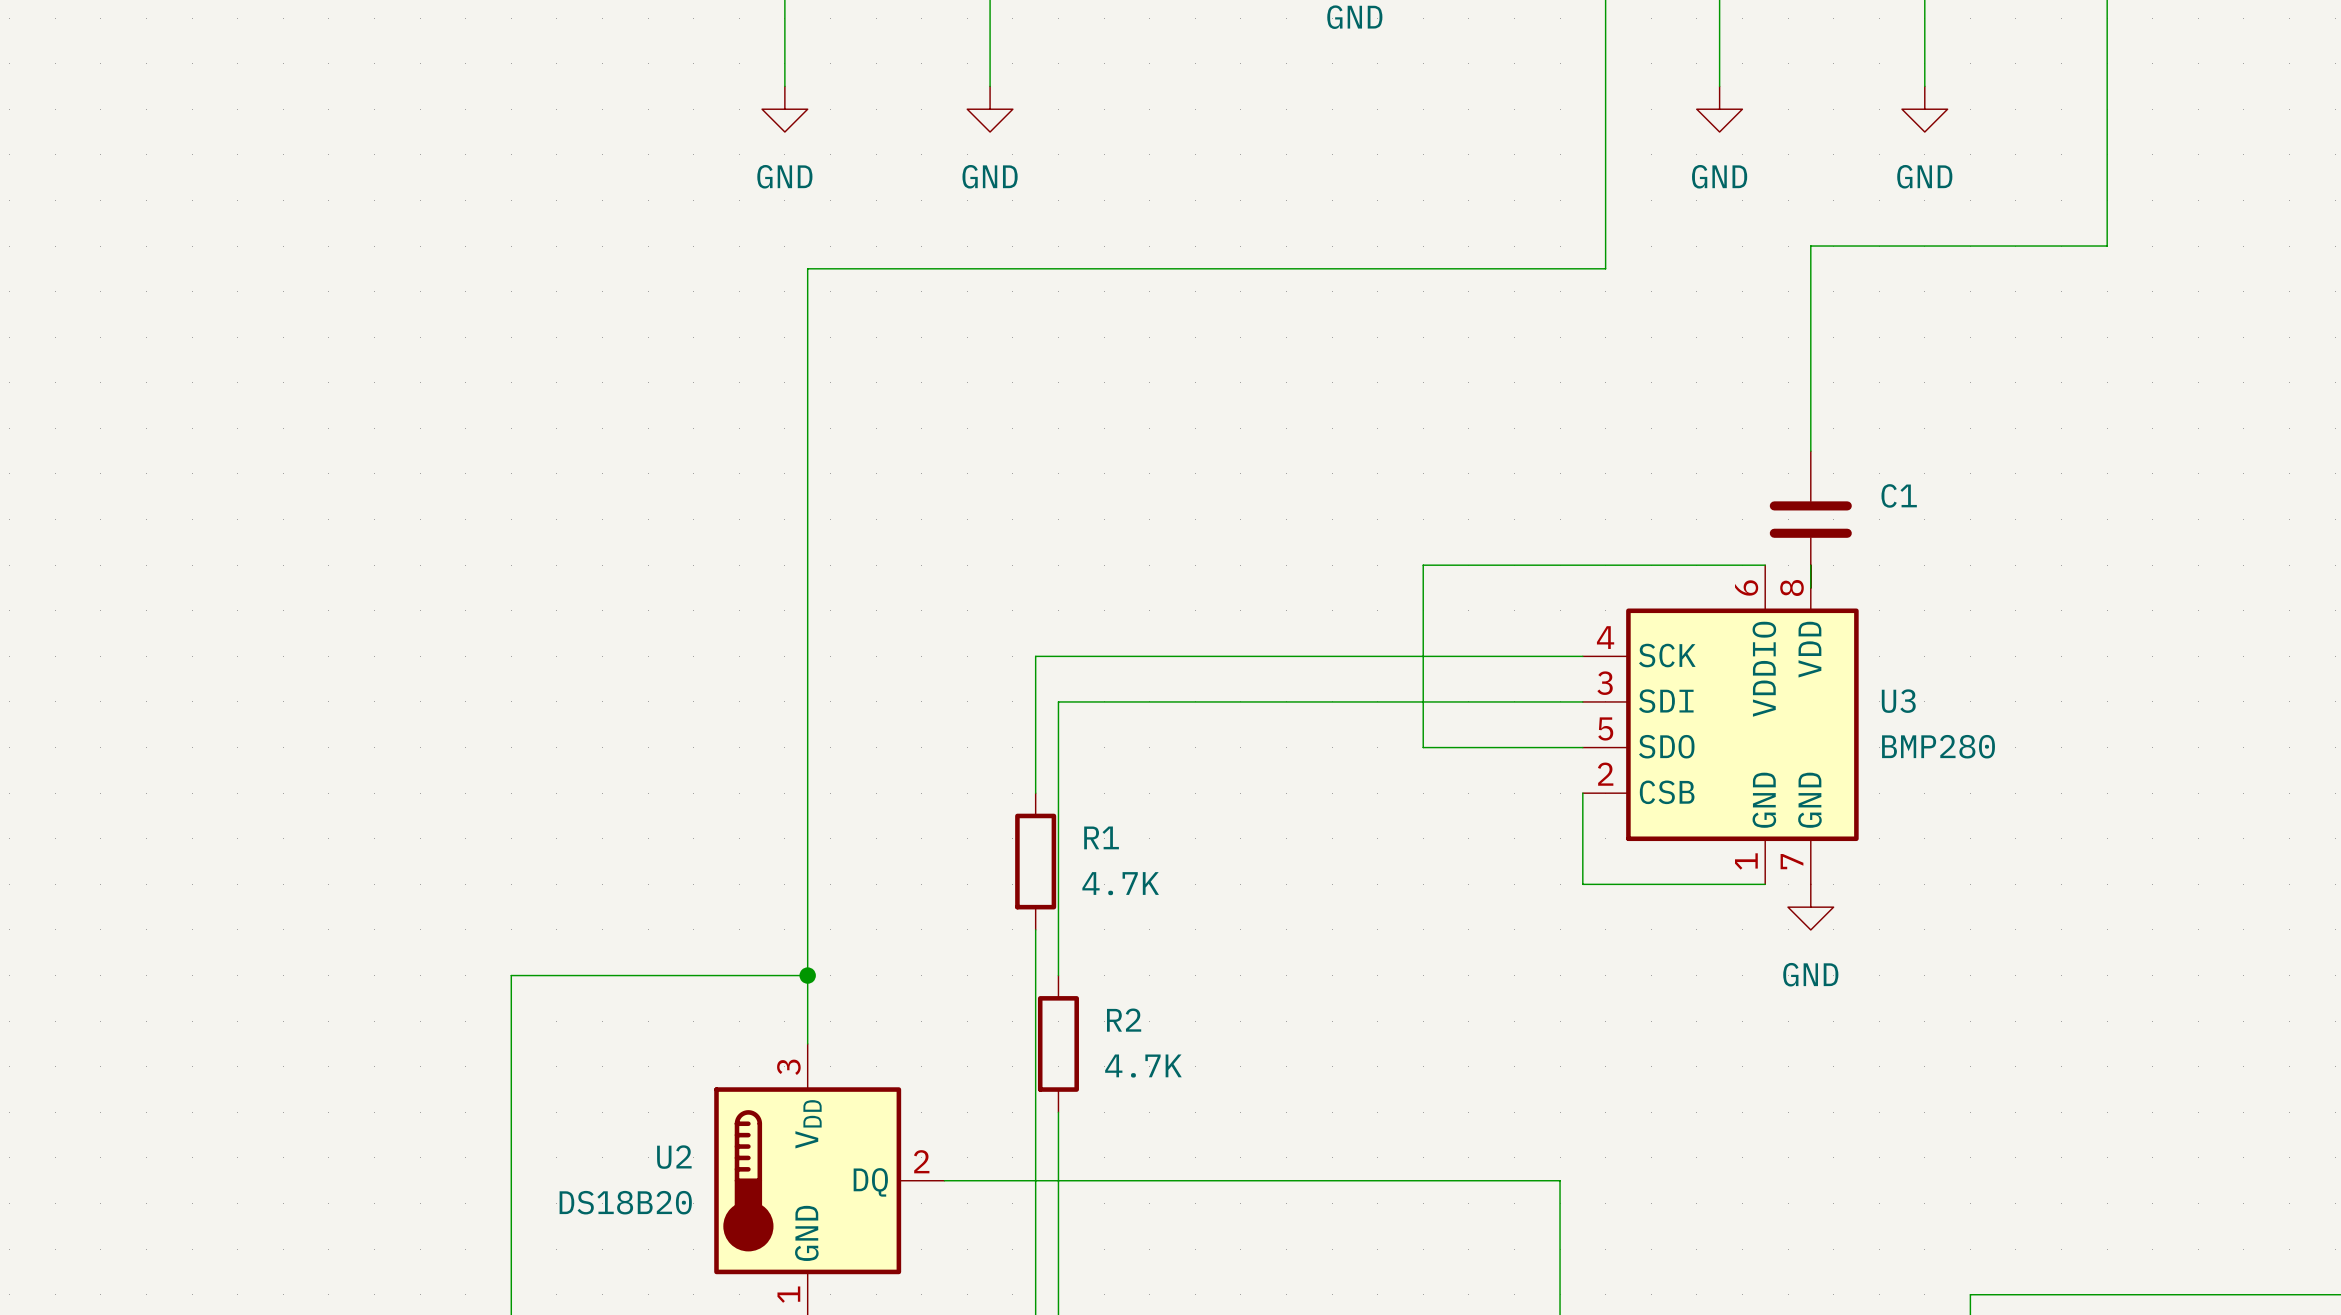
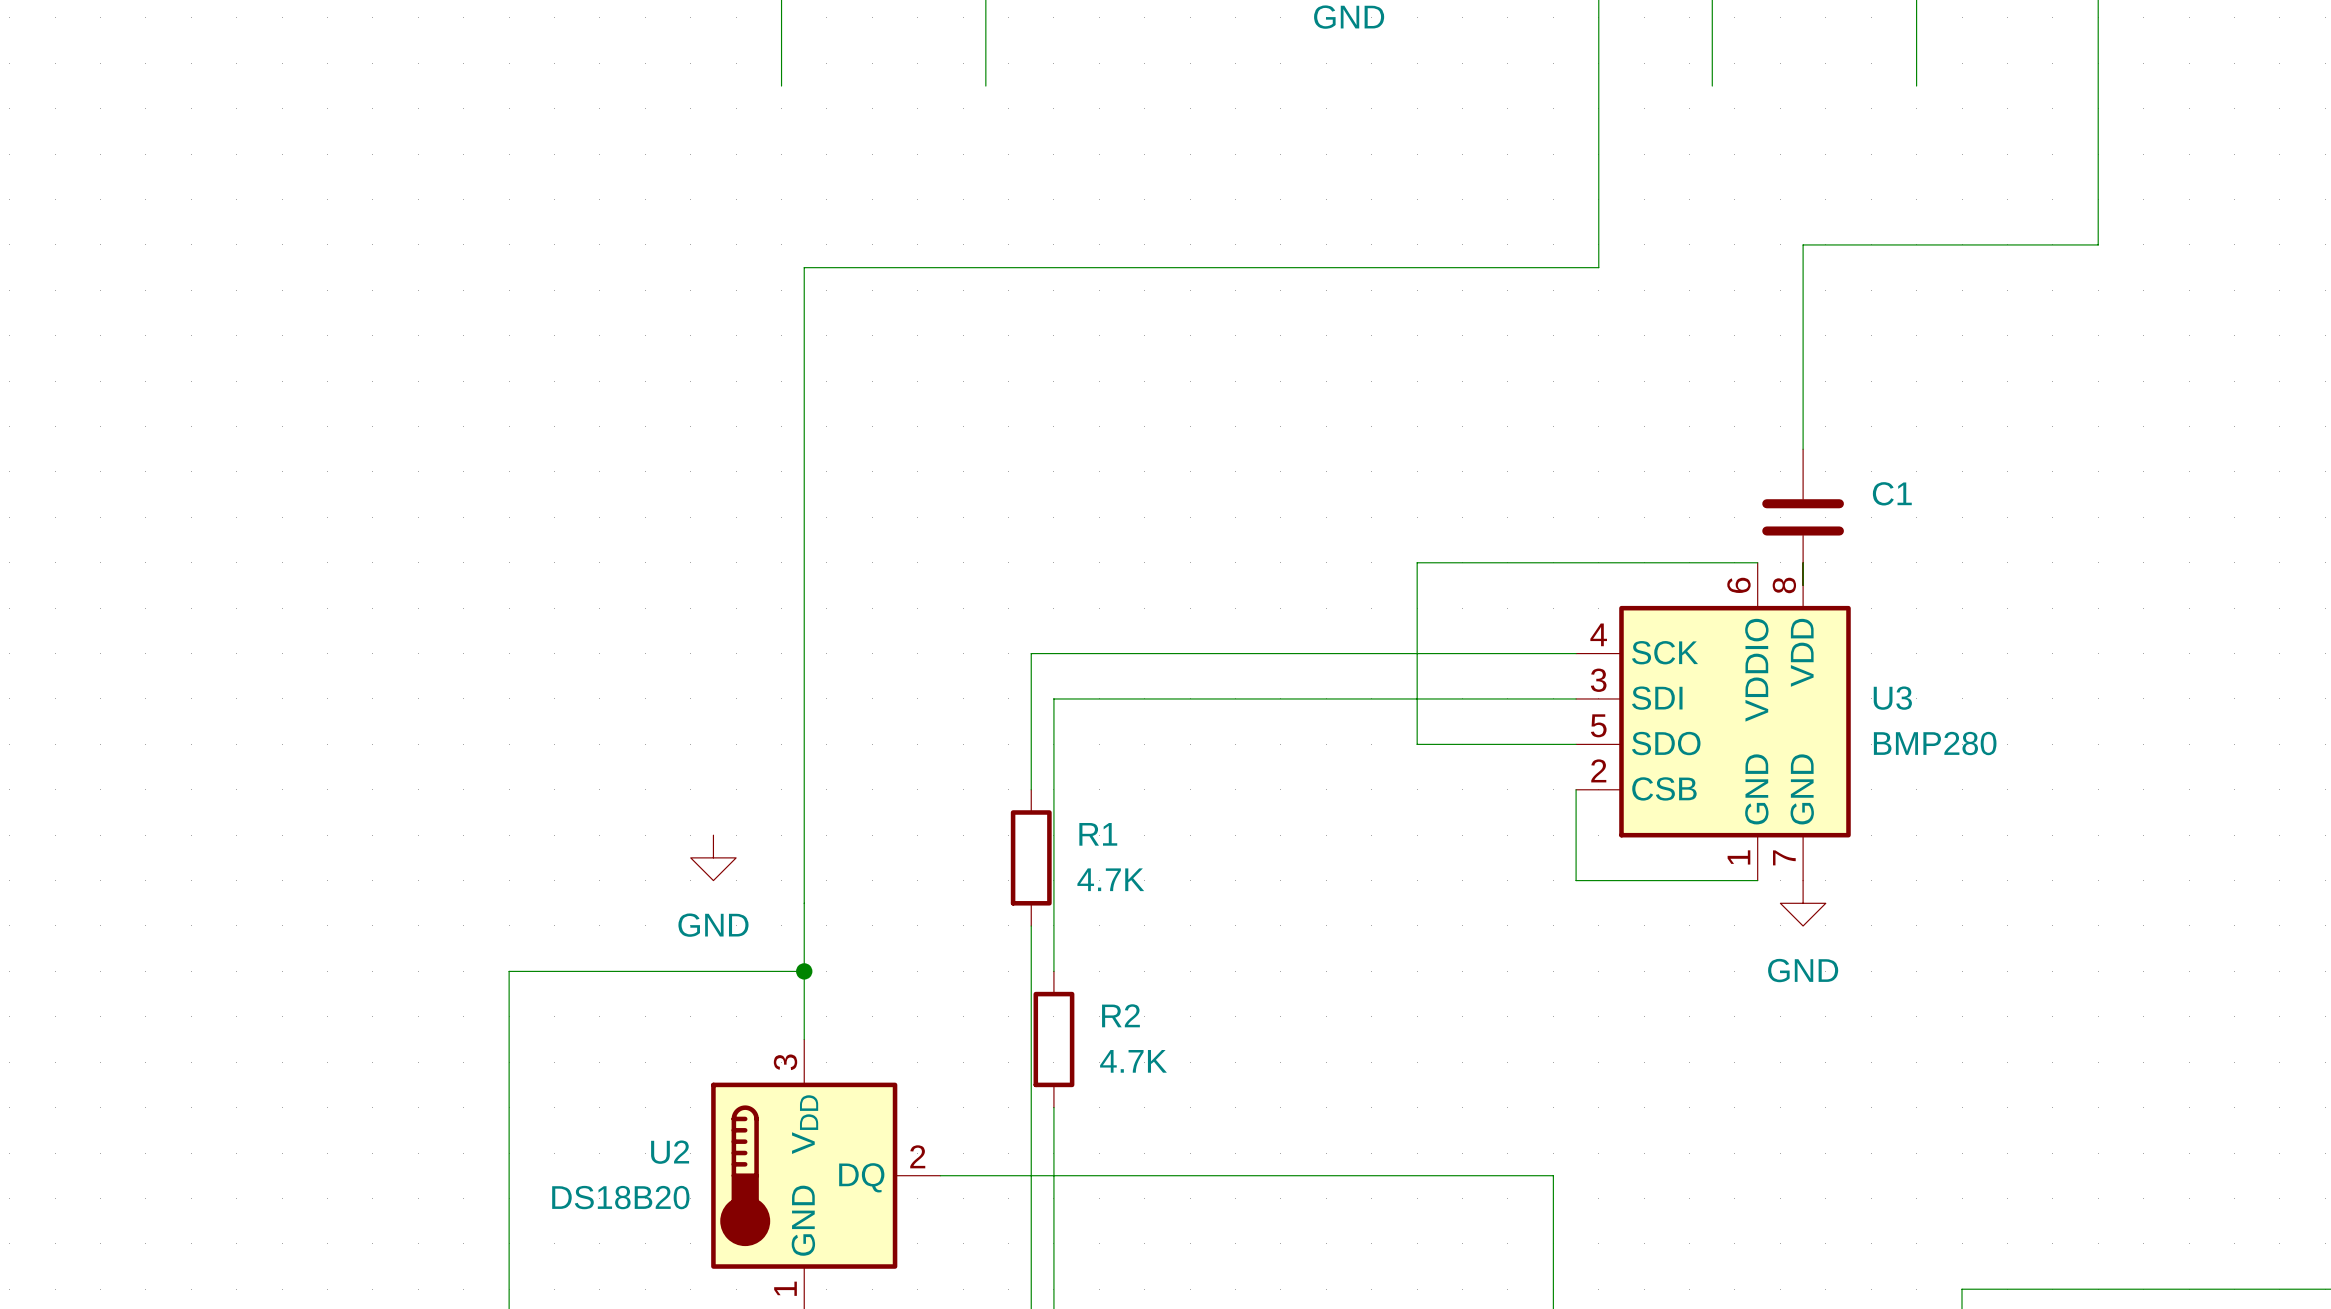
power symbol: GND (784, 109) -> none
power symbol: GND (990, 109) -> none
power symbol: GND (1719, 109) -> none
power symbol: GND (1924, 109) -> none
power symbol: none -> GND (713, 857)

